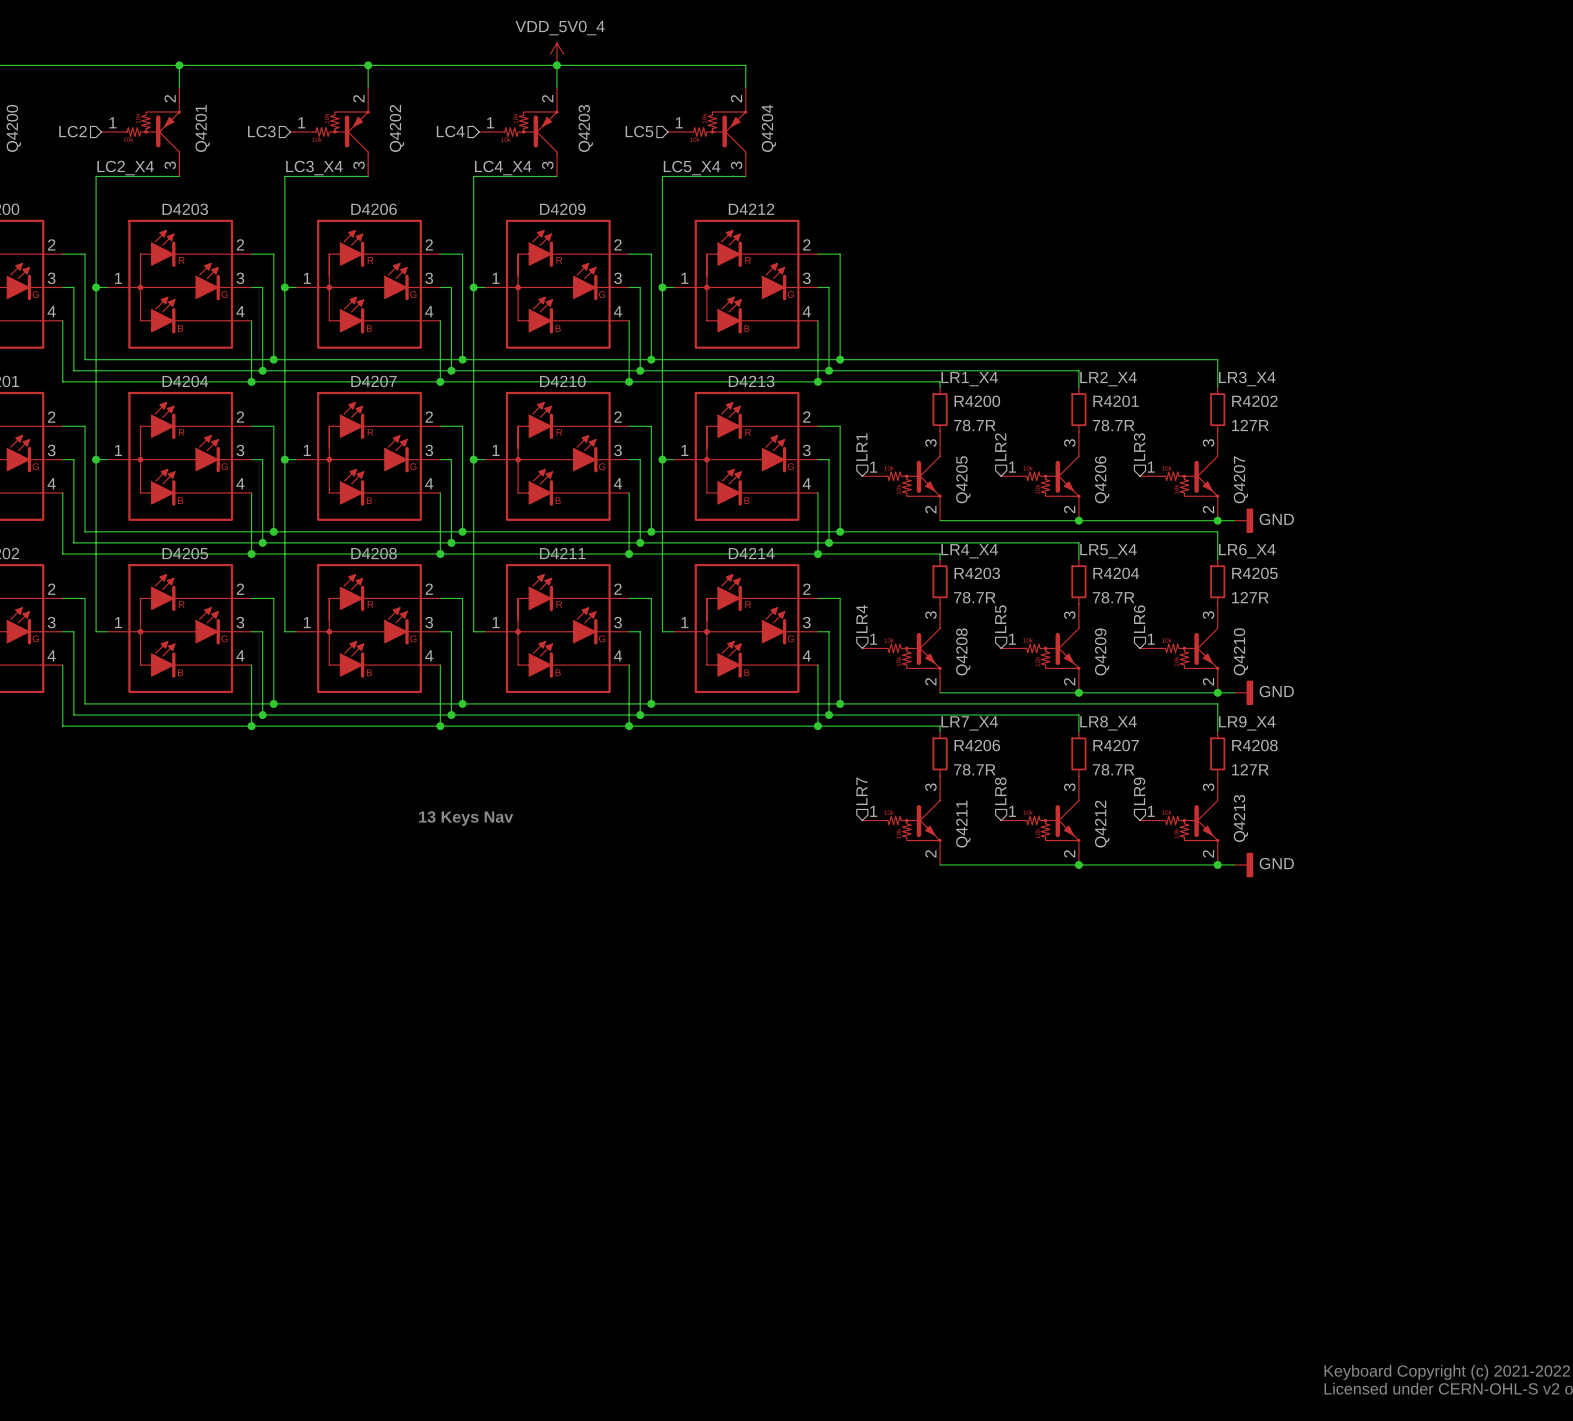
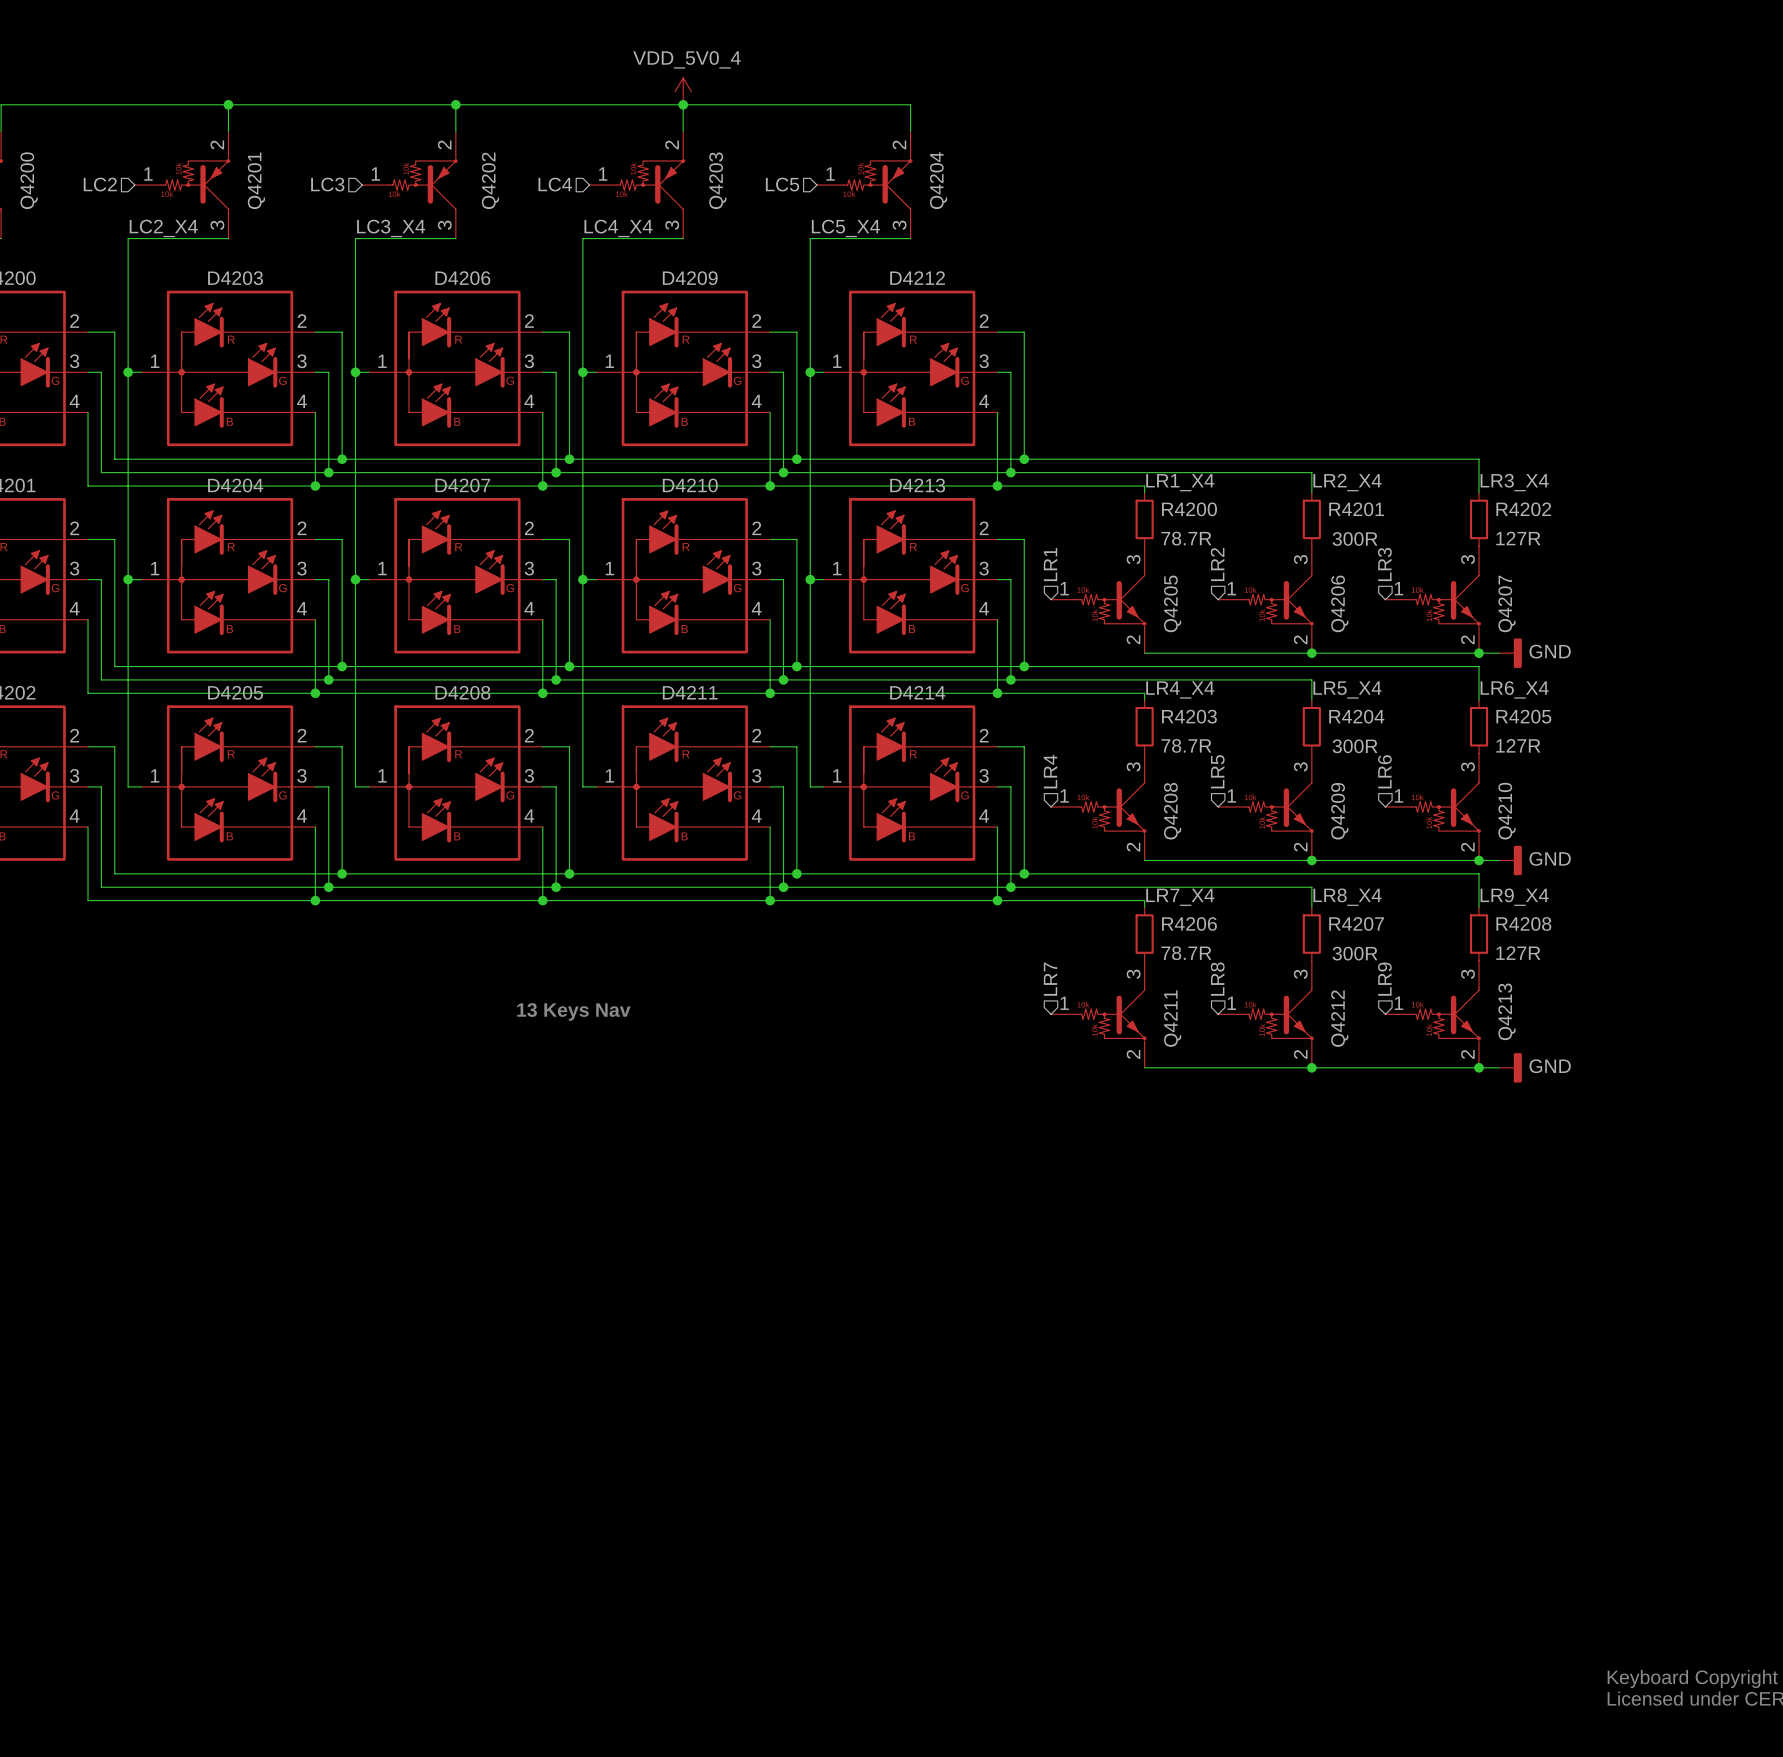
R4201 value: 78.7R (1113, 425) -> 300R (1355, 538)
R4204 value: 78.7R (1113, 597) -> 300R (1355, 746)
R4207 value: 78.7R (1113, 769) -> 300R (1355, 953)

